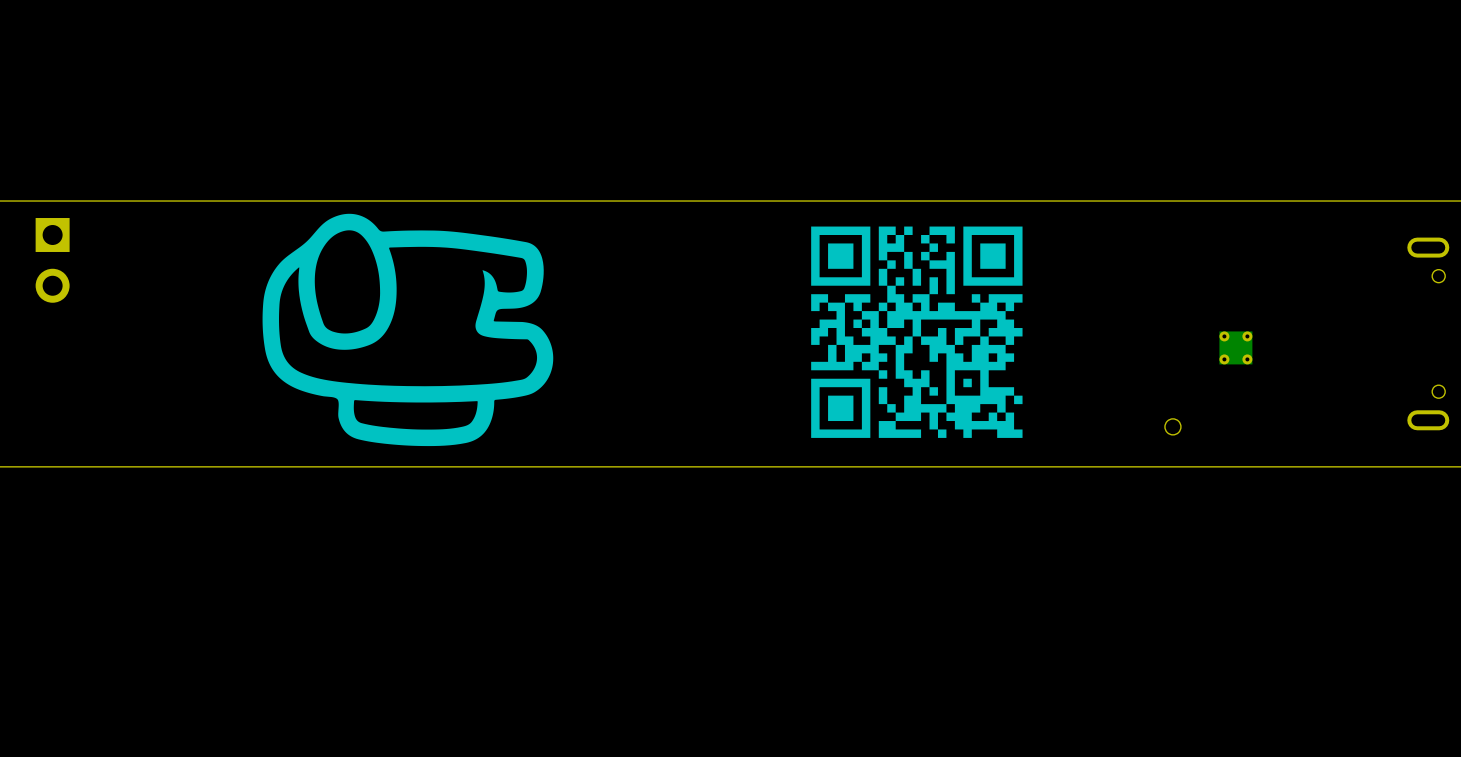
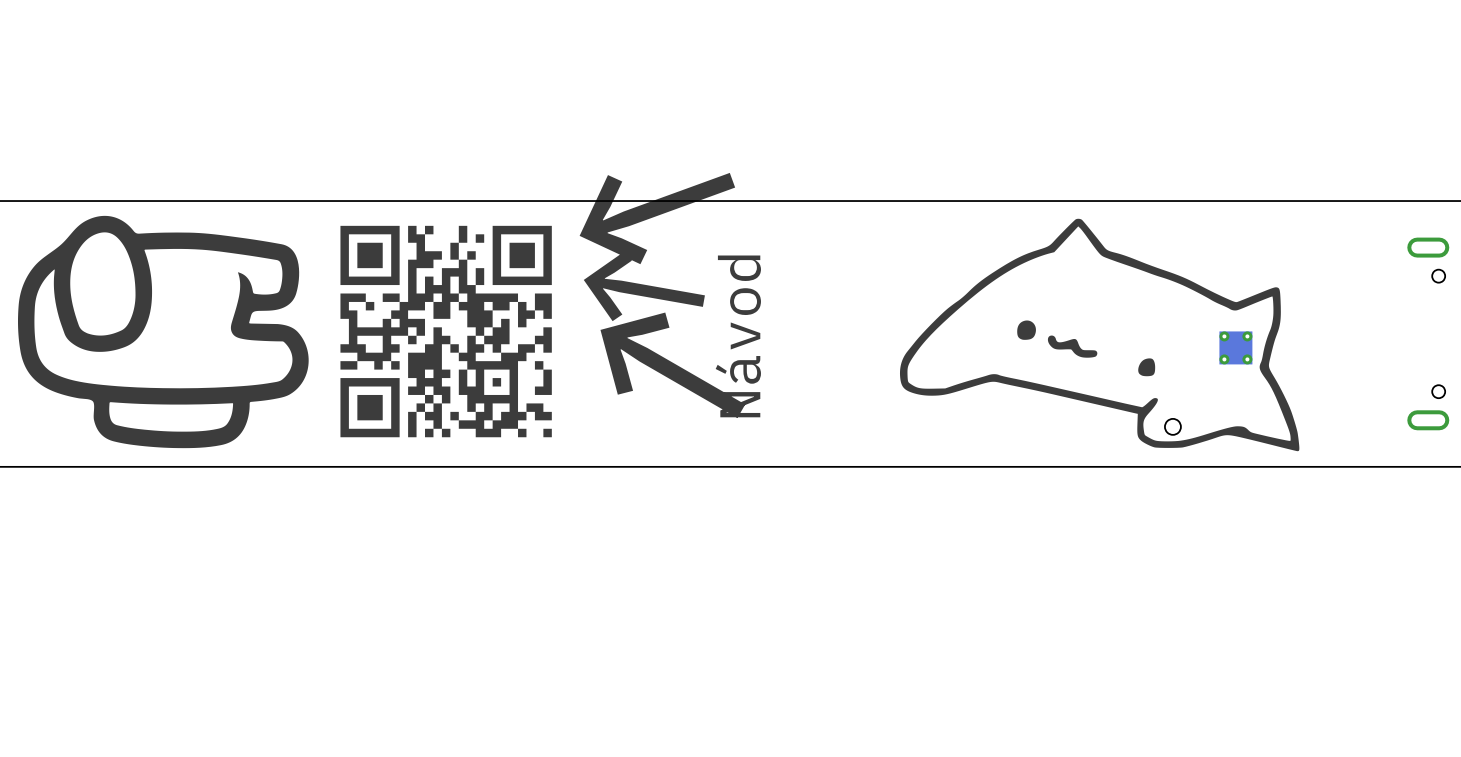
drawing: none -> [899, 218, 1300, 452]
drawing: none -> [340, 225, 552, 438]
drawing: [811, 226, 1023, 438] -> none
text: none -> ↓ (657, 218)
part: (52, 260) -> none
text: none -> ↓ (644, 286)
text: none -> Návod (738, 336)
drawing shape: [1014, 328, 1023, 337] -> [1017, 320, 1036, 340]
drawing position: (407, 329) -> (163, 332)
text: none -> ↓ (672, 365)

